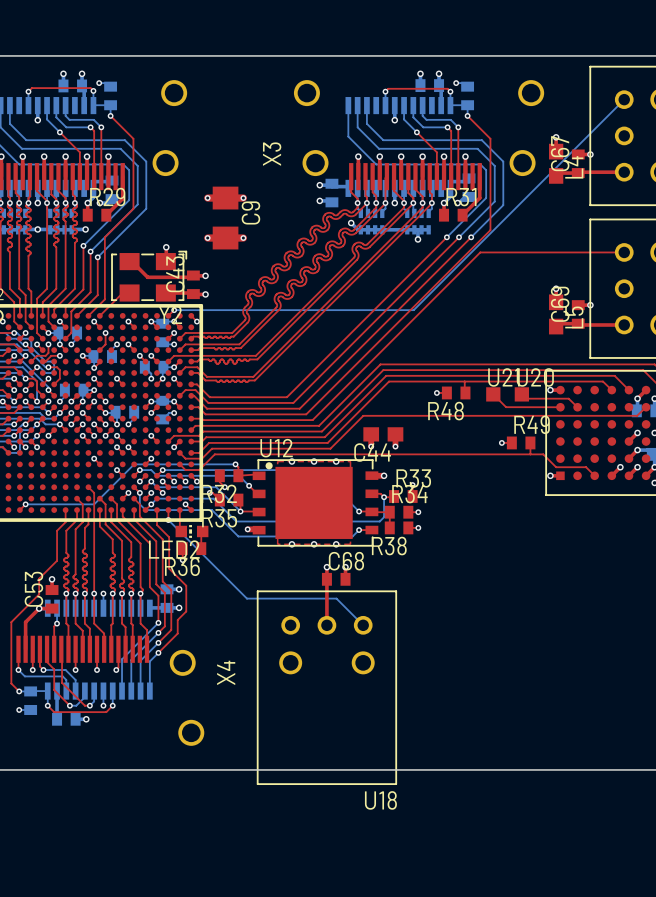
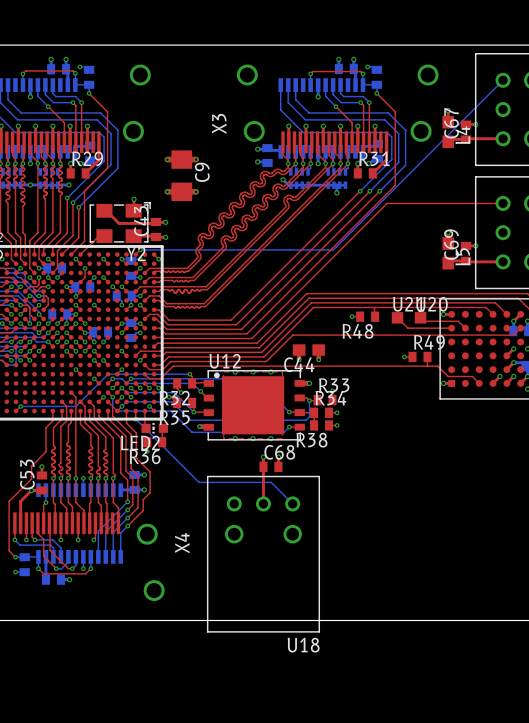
via: (14, 332) -> none
via: (25, 344) -> none

